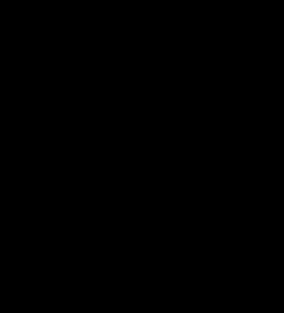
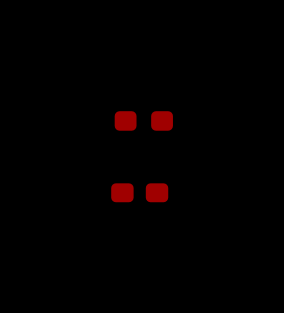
part: none -> (143, 120)
part: none -> (139, 192)

